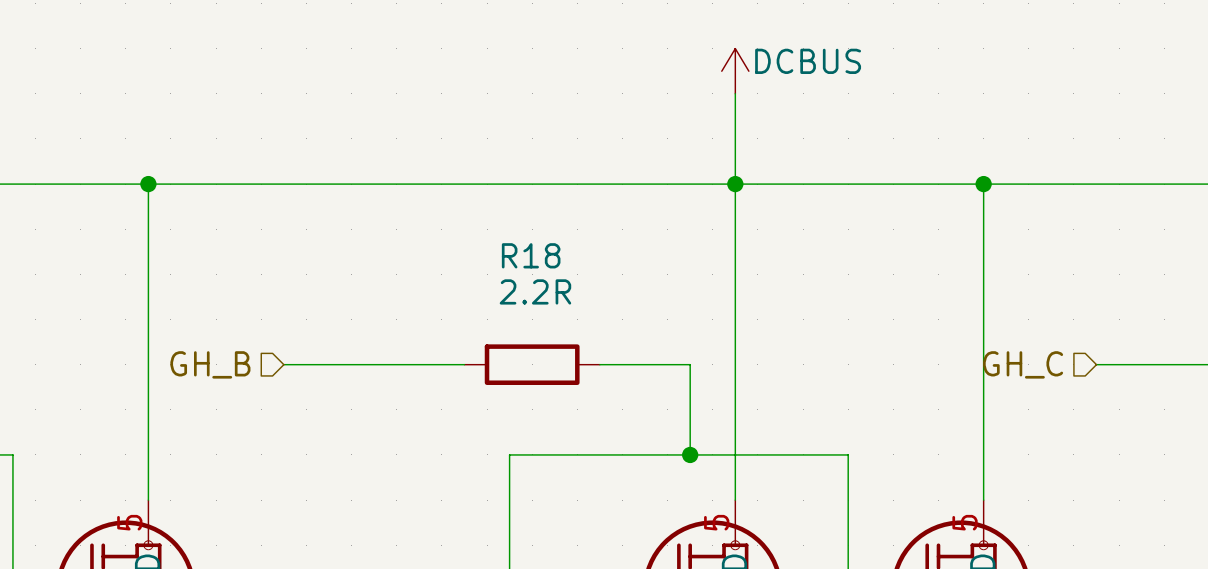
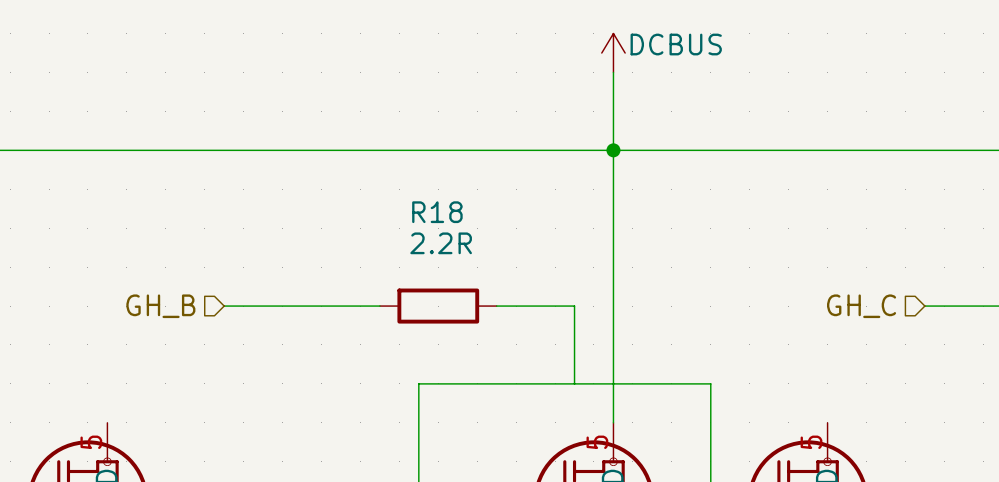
wire: (148, 184) (148, 500) -> none
junction: (148, 184) -> none
wire: (983, 184) (983, 500) -> none
junction: (983, 184) -> none
junction: (690, 454) -> none

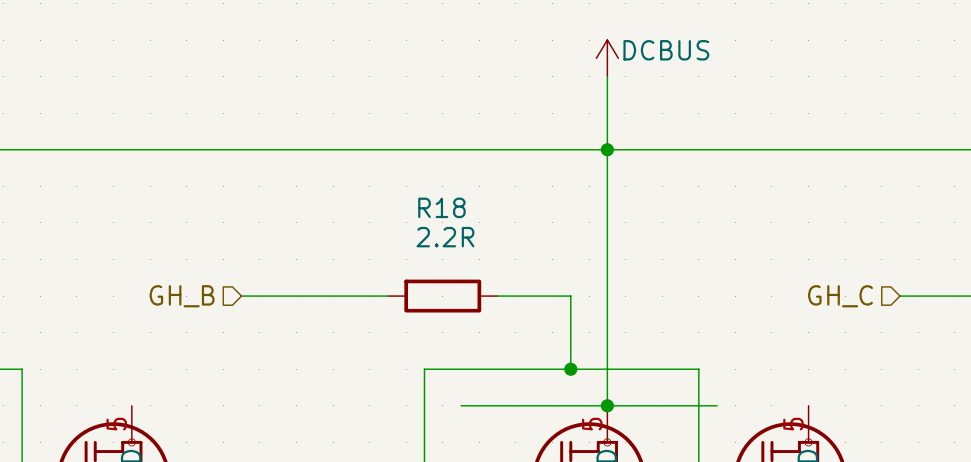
junction: none -> (570, 369)
wire: none -> (461, 405) (717, 405)
junction: none -> (607, 405)

